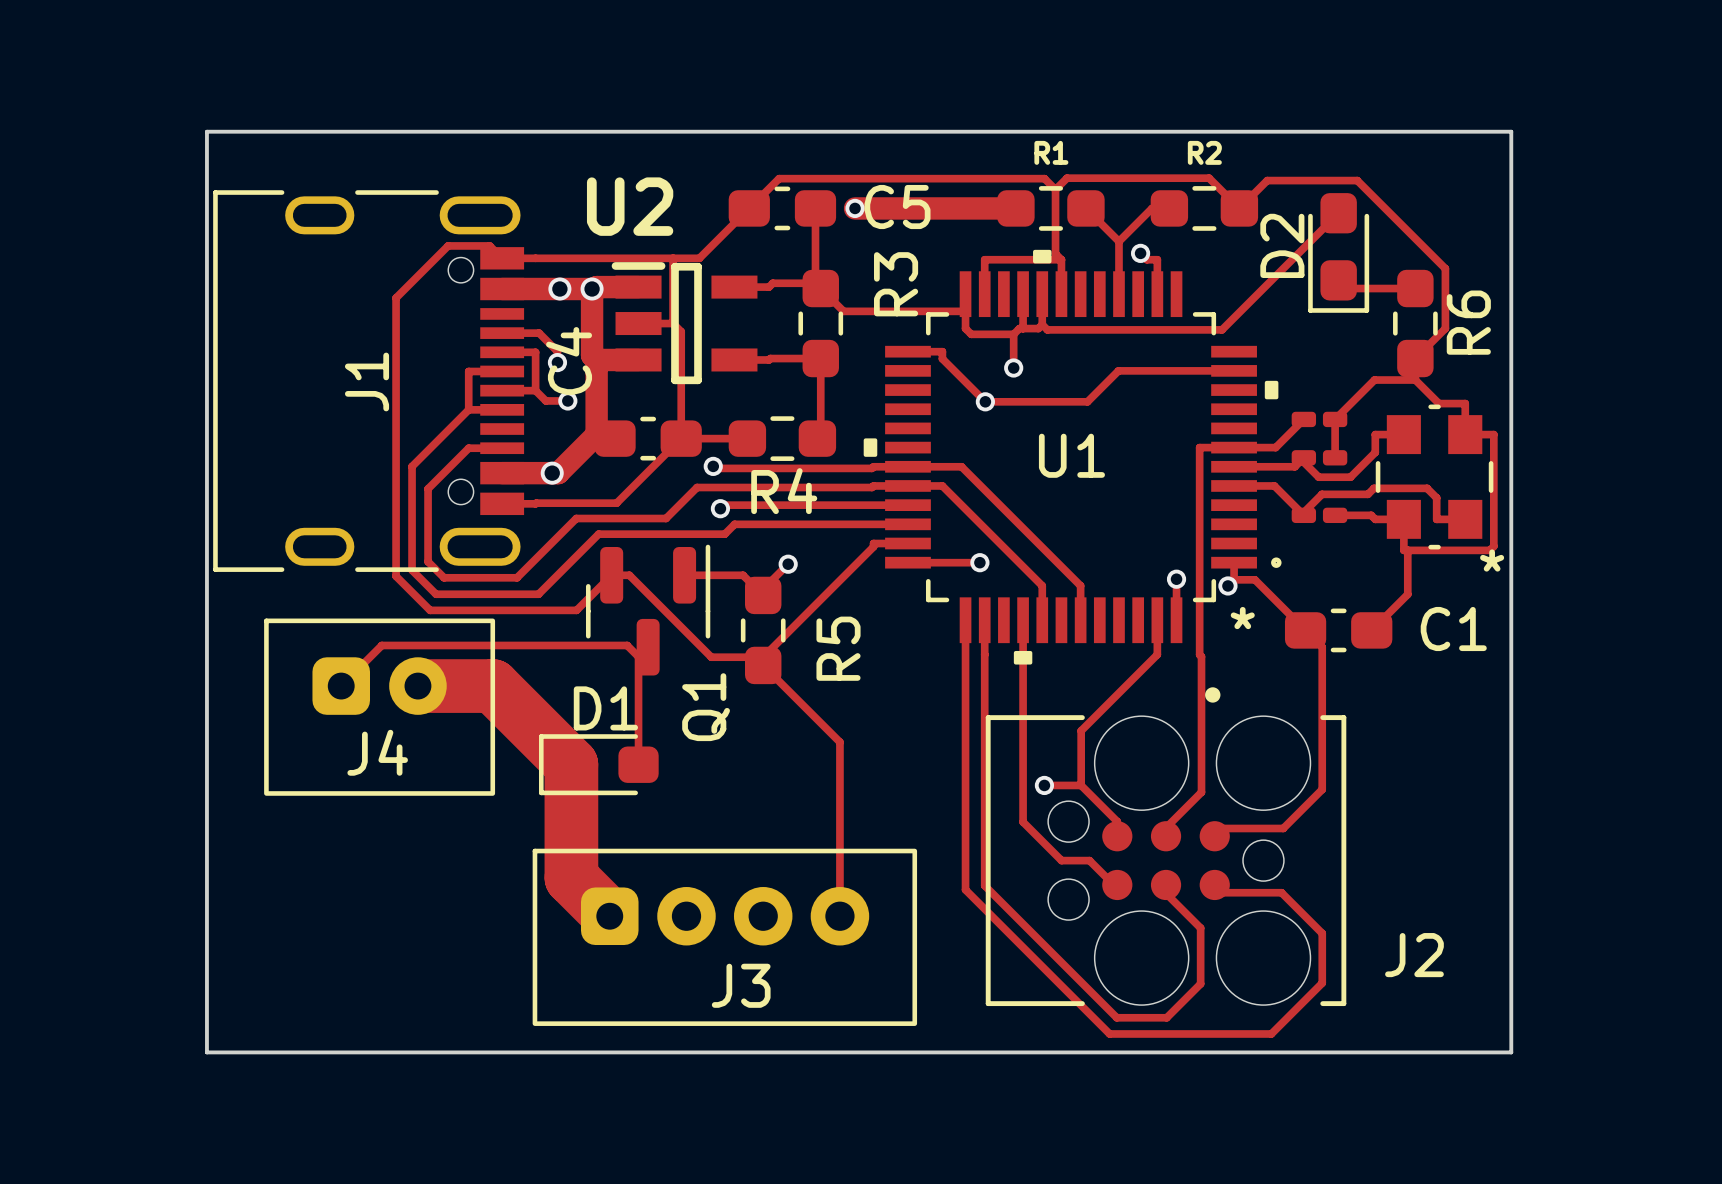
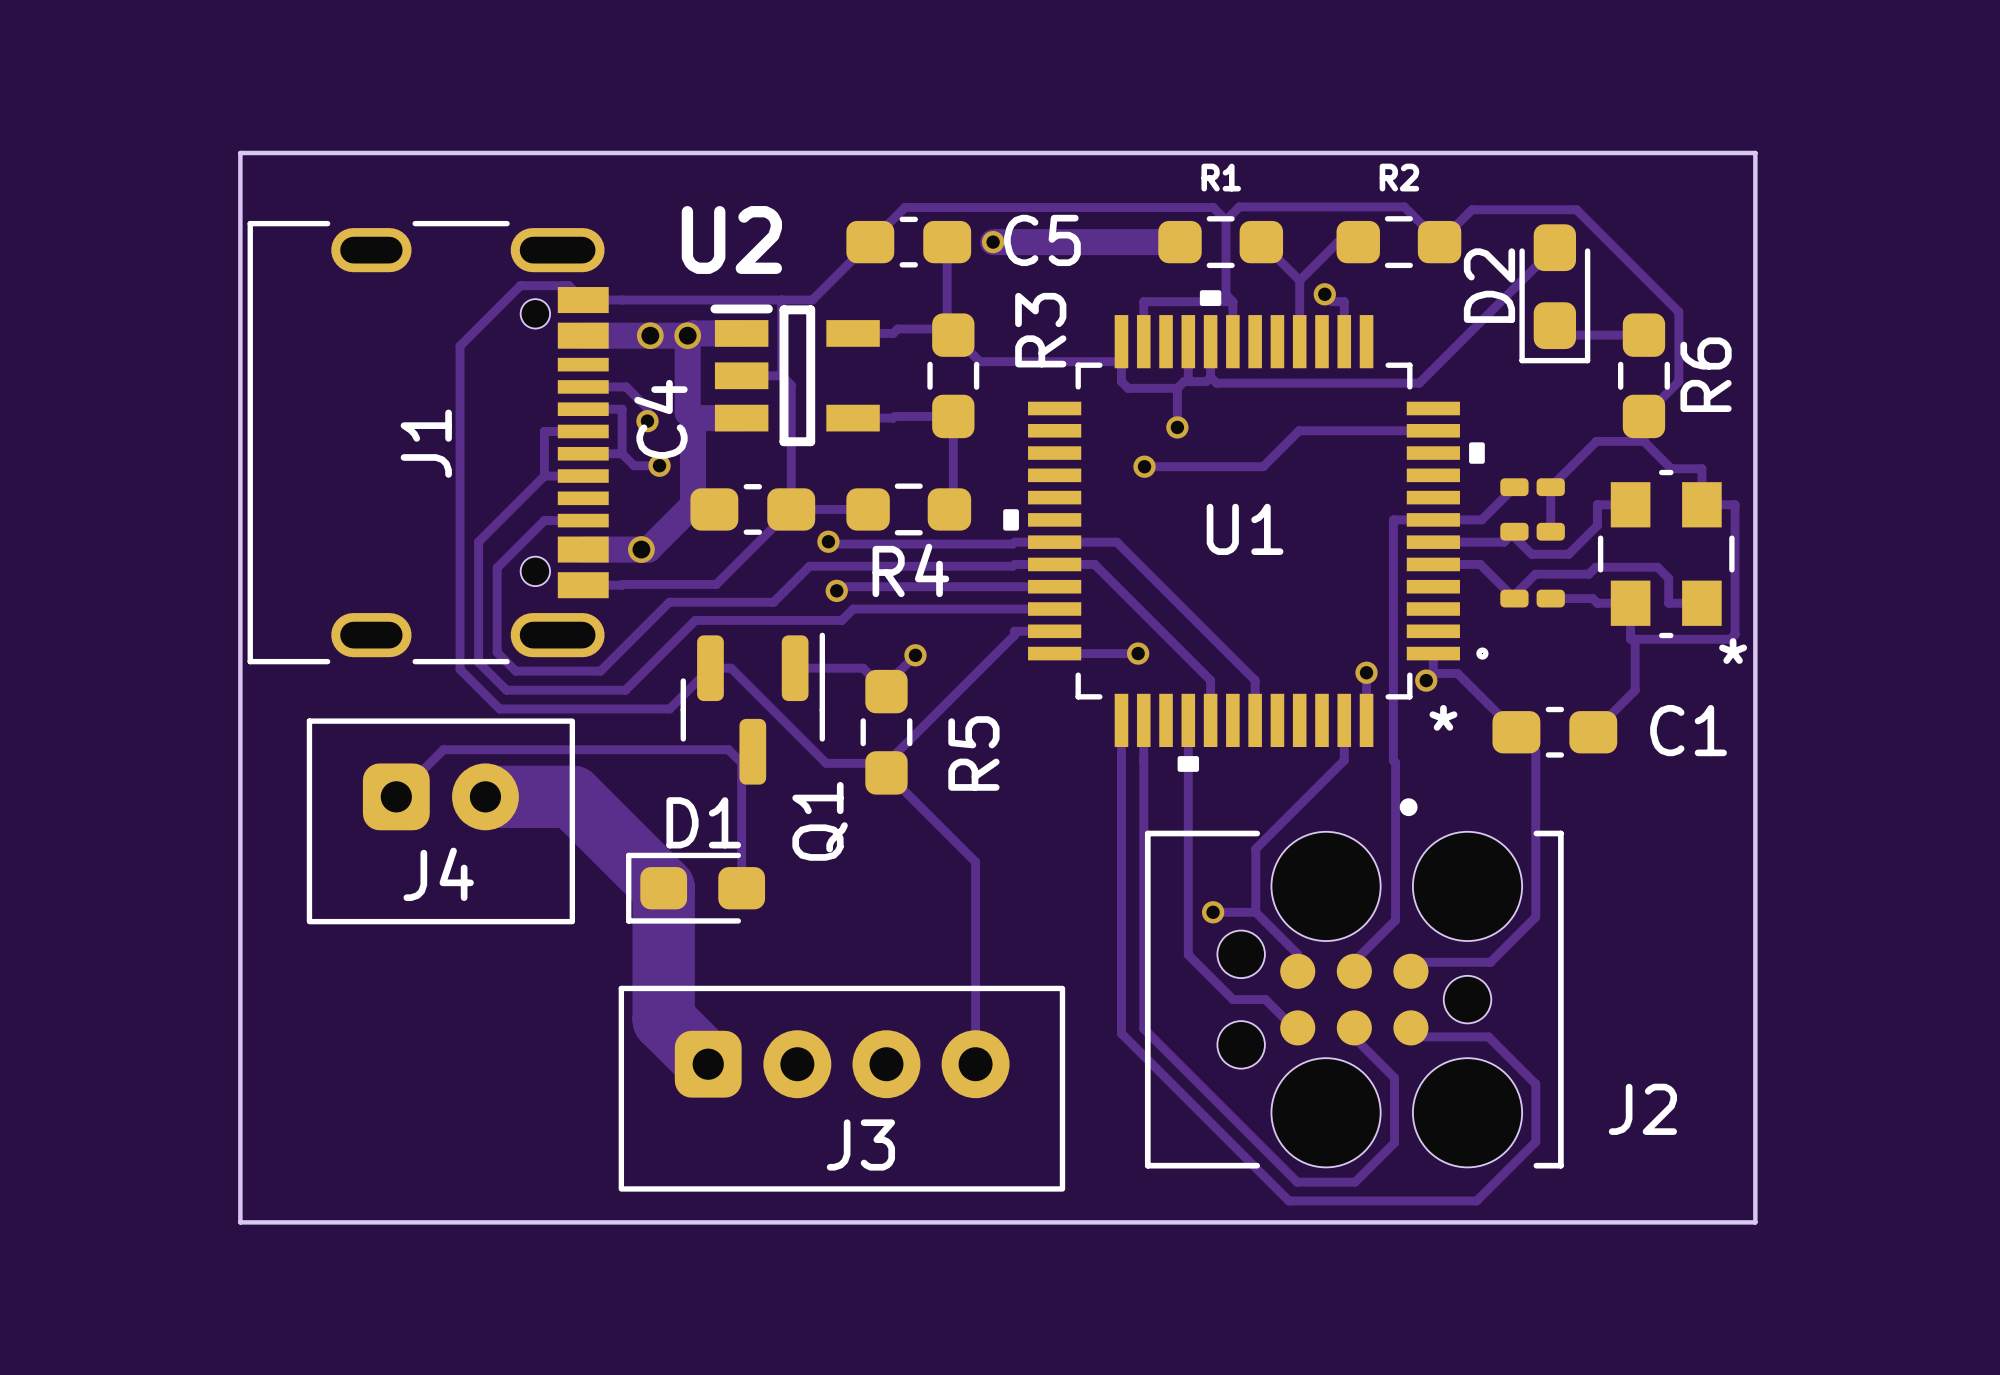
track: (907, 351) (942, 351) (942, 358) (985, 401) -> none

